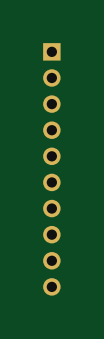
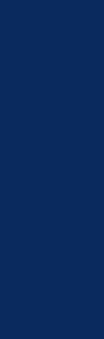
part: (51, 169) -> none

